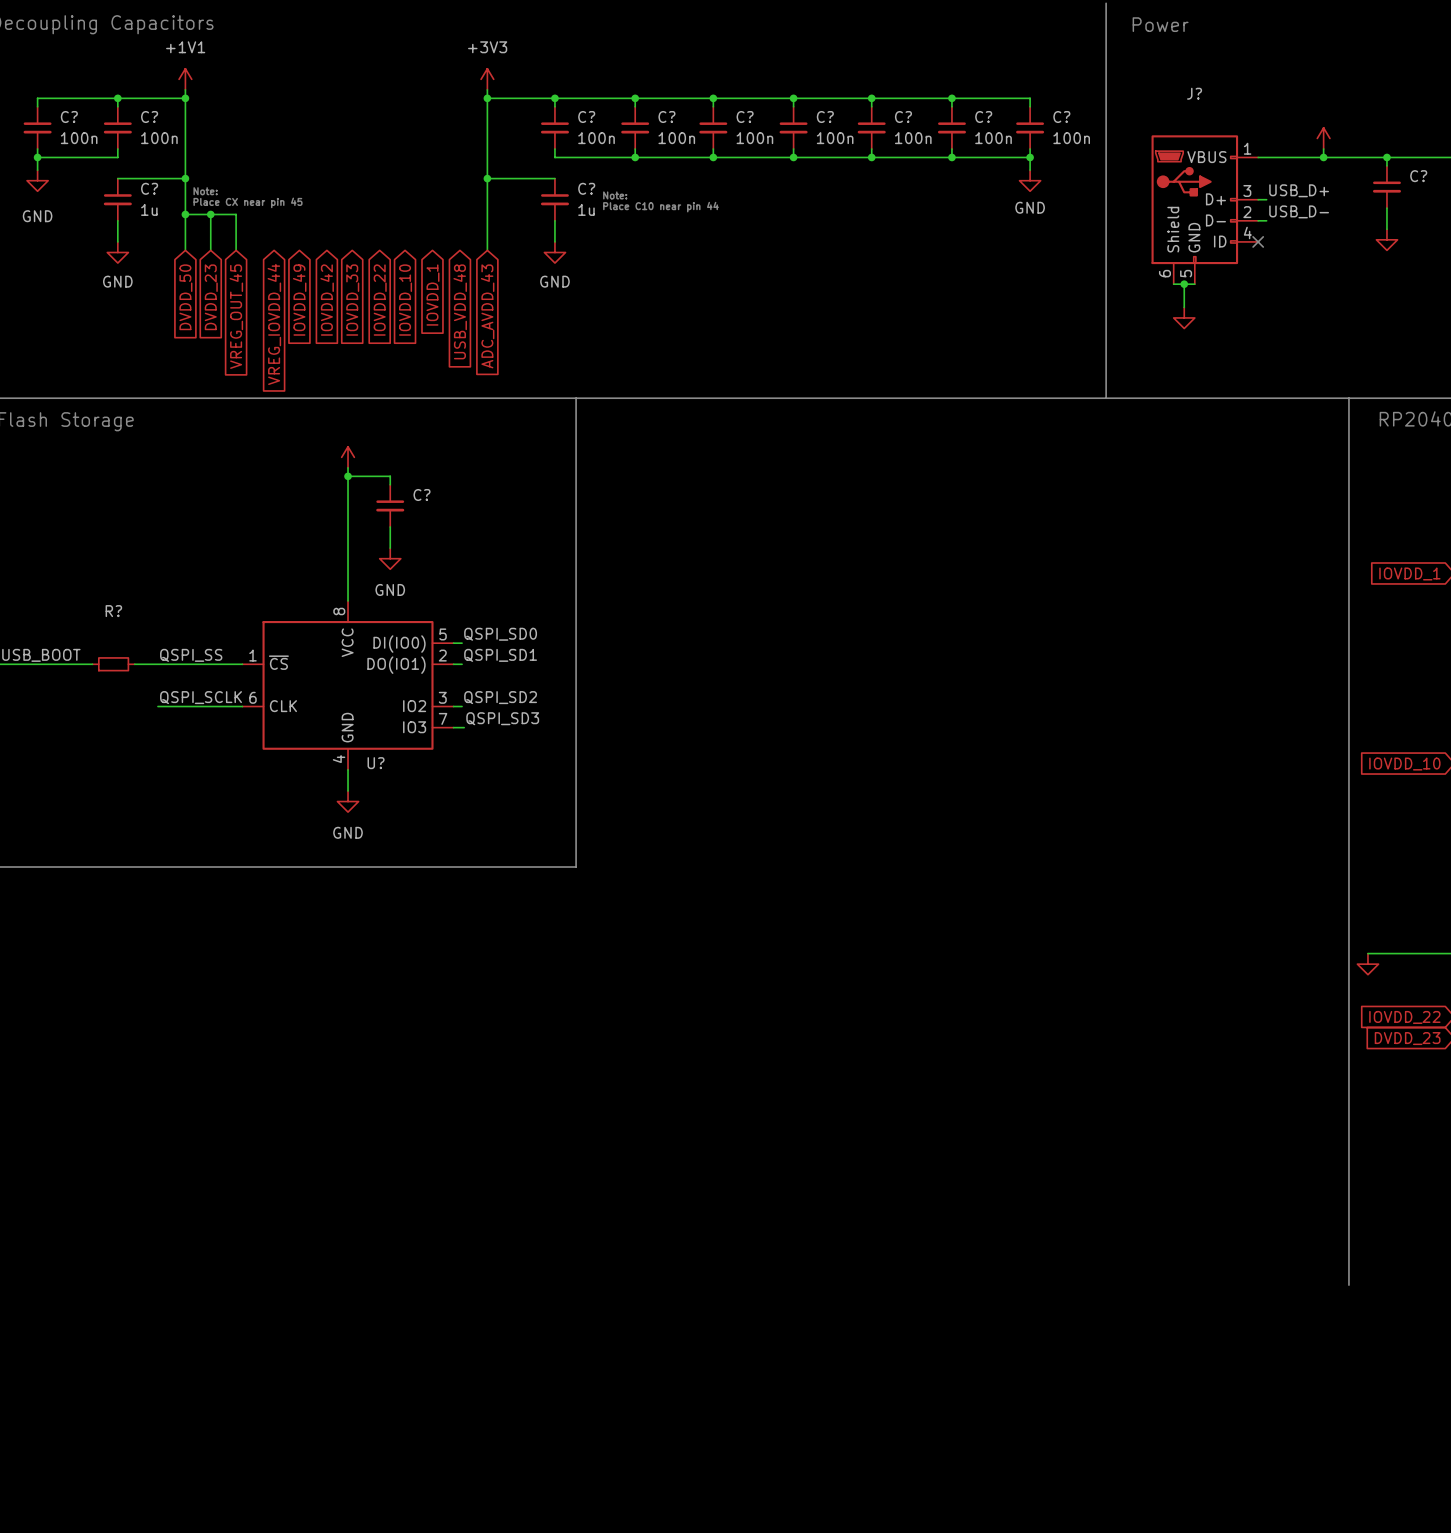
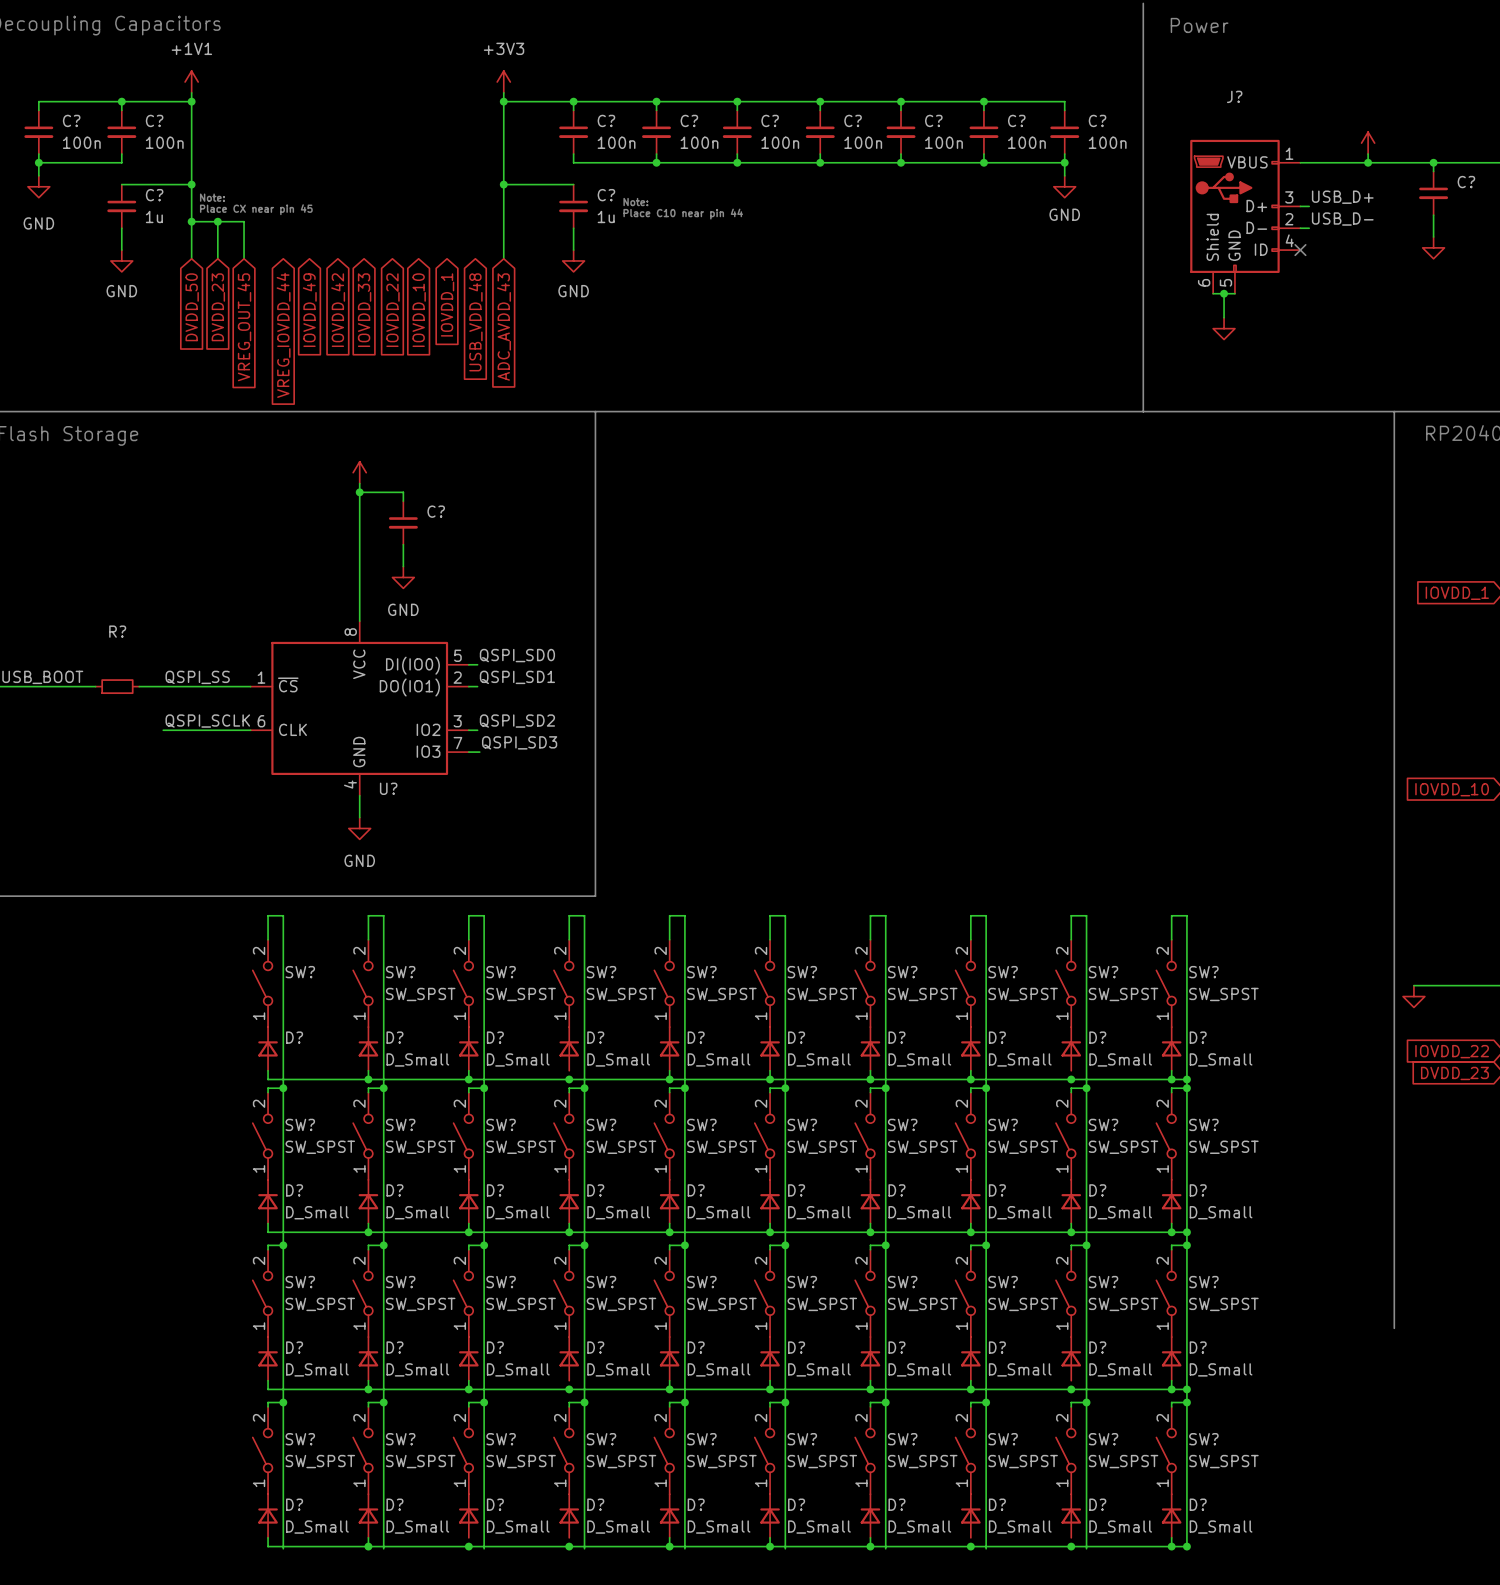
wire: none -> (268, 939) (268, 915) (283, 915) (283, 1548)
wire: none -> (368, 939) (368, 915) (383, 915) (383, 1548)
wire: none -> (468, 939) (468, 915) (484, 915) (484, 1548)
wire: none -> (569, 939) (569, 915) (584, 915) (584, 1548)
wire: none -> (669, 939) (669, 915) (684, 915) (684, 1548)
wire: none -> (770, 939) (770, 915) (785, 915) (785, 1548)
wire: none -> (870, 939) (870, 915) (885, 915) (885, 1548)
wire: none -> (970, 939) (970, 915) (986, 915) (986, 1548)
wire: none -> (1071, 939) (1071, 915) (1086, 915) (1086, 1548)
wire: none -> (1171, 939) (1171, 915) (1186, 915) (1186, 1548)
SW?: none -> (262, 983)
SW?: none -> SW_SPST (362, 983)
SW?: none -> SW_SPST (463, 983)
SW?: none -> SW_SPST (563, 983)
SW?: none -> SW_SPST (664, 983)
SW?: none -> SW_SPST (764, 983)
SW?: none -> SW_SPST (865, 983)
SW?: none -> SW_SPST (965, 983)
SW?: none -> SW_SPST (1065, 983)
SW?: none -> SW_SPST (1166, 983)
D?: none -> (268, 1048)
D?: none -> D_Small (368, 1048)
D?: none -> D_Small (468, 1048)
D?: none -> D_Small (569, 1048)
D?: none -> D_Small (669, 1048)
D?: none -> D_Small (770, 1048)
D?: none -> D_Small (870, 1048)
D?: none -> D_Small (970, 1048)
D?: none -> D_Small (1071, 1048)
D?: none -> D_Small (1171, 1048)
wire: none -> (268, 1070) (268, 1079) (1186, 1079)
wire: none -> (368, 1070) (368, 1079)
wire: none -> (468, 1070) (468, 1079)
wire: none -> (669, 1070) (669, 1079)
wire: none -> (770, 1070) (770, 1079)
wire: none -> (870, 1070) (870, 1079)
wire: none -> (970, 1070) (970, 1079)
wire: none -> (1171, 1070) (1171, 1079)
junction: none -> (368, 1079)
junction: none -> (468, 1079)
junction: none -> (569, 1079)
junction: none -> (669, 1079)
junction: none -> (770, 1079)
junction: none -> (870, 1079)
junction: none -> (970, 1079)
junction: none -> (1071, 1079)
junction: none -> (1171, 1079)
junction: none -> (1186, 1079)
wire: none -> (283, 1088) (268, 1088) (268, 1092)
junction: none -> (283, 1088)
wire: none -> (383, 1088) (368, 1088) (368, 1092)
junction: none -> (383, 1088)
wire: none -> (484, 1088) (468, 1088) (468, 1092)
junction: none -> (484, 1088)
wire: none -> (584, 1088) (569, 1088) (569, 1092)
junction: none -> (584, 1088)
wire: none -> (684, 1088) (669, 1088) (669, 1092)
junction: none -> (684, 1088)
wire: none -> (785, 1088) (770, 1088) (770, 1092)
junction: none -> (785, 1088)
wire: none -> (885, 1088) (870, 1088) (870, 1092)
junction: none -> (885, 1088)
wire: none -> (986, 1088) (970, 1088) (970, 1092)
junction: none -> (986, 1088)
wire: none -> (1086, 1088) (1071, 1088) (1071, 1092)
junction: none -> (1086, 1088)
wire: none -> (1186, 1088) (1171, 1088) (1171, 1092)
junction: none -> (1186, 1088)
SW?: none -> SW_SPST (262, 1136)
SW?: none -> SW_SPST (362, 1136)
SW?: none -> SW_SPST (463, 1136)
SW?: none -> SW_SPST (563, 1136)
SW?: none -> SW_SPST (664, 1136)
SW?: none -> SW_SPST (764, 1136)
SW?: none -> SW_SPST (865, 1136)
SW?: none -> SW_SPST (965, 1136)
SW?: none -> SW_SPST (1065, 1136)
SW?: none -> SW_SPST (1166, 1136)
D?: none -> D_Small (268, 1201)
D?: none -> D_Small (368, 1201)
D?: none -> D_Small (468, 1201)
D?: none -> D_Small (569, 1201)
D?: none -> D_Small (669, 1201)
D?: none -> D_Small (770, 1201)
D?: none -> D_Small (870, 1201)
D?: none -> D_Small (970, 1201)
D?: none -> D_Small (1071, 1201)
D?: none -> D_Small (1171, 1201)
wire: none -> (268, 1223) (268, 1232) (1186, 1232)
wire: none -> (368, 1223) (368, 1232)
wire: none -> (468, 1223) (468, 1232)
wire: none -> (569, 1223) (569, 1232)
wire: none -> (669, 1223) (669, 1232)
wire: none -> (770, 1223) (770, 1232)
wire: none -> (870, 1223) (870, 1232)
wire: none -> (970, 1223) (970, 1232)
wire: none -> (1071, 1223) (1071, 1232)
wire: none -> (1171, 1223) (1171, 1232)
junction: none -> (368, 1232)
junction: none -> (468, 1232)
junction: none -> (569, 1232)
junction: none -> (669, 1232)
junction: none -> (770, 1232)
junction: none -> (870, 1232)
junction: none -> (970, 1232)
junction: none -> (1071, 1232)
junction: none -> (1171, 1232)
junction: none -> (1186, 1232)
wire: none -> (283, 1245) (268, 1245) (268, 1249)
junction: none -> (283, 1245)
wire: none -> (383, 1245) (368, 1245) (368, 1249)
junction: none -> (383, 1245)
wire: none -> (484, 1245) (468, 1245) (468, 1249)
junction: none -> (484, 1245)
wire: none -> (584, 1245) (569, 1245) (569, 1249)
junction: none -> (584, 1245)
wire: none -> (684, 1245) (669, 1245) (669, 1249)
junction: none -> (684, 1245)
wire: none -> (785, 1245) (770, 1245) (770, 1249)
junction: none -> (785, 1245)
wire: none -> (885, 1245) (870, 1245) (870, 1249)
junction: none -> (885, 1245)
wire: none -> (986, 1245) (970, 1245) (970, 1249)
junction: none -> (986, 1245)
wire: none -> (1086, 1245) (1071, 1245) (1071, 1249)
junction: none -> (1086, 1245)
wire: none -> (1186, 1245) (1171, 1245) (1171, 1249)
junction: none -> (1186, 1245)
SW?: none -> SW_SPST (262, 1293)
SW?: none -> SW_SPST (362, 1293)
SW?: none -> SW_SPST (463, 1293)
SW?: none -> SW_SPST (563, 1293)
SW?: none -> SW_SPST (664, 1293)
SW?: none -> SW_SPST (764, 1293)
SW?: none -> SW_SPST (865, 1293)
SW?: none -> SW_SPST (965, 1293)
SW?: none -> SW_SPST (1065, 1293)
SW?: none -> SW_SPST (1166, 1293)
D?: none -> D_Small (268, 1358)
D?: none -> D_Small (368, 1358)
D?: none -> D_Small (468, 1358)
D?: none -> D_Small (569, 1358)
D?: none -> D_Small (669, 1358)
D?: none -> D_Small (770, 1358)
D?: none -> D_Small (870, 1358)
D?: none -> D_Small (970, 1358)
D?: none -> D_Small (1071, 1358)
D?: none -> D_Small (1171, 1358)
wire: none -> (268, 1380) (268, 1389) (1186, 1389)
wire: none -> (368, 1380) (368, 1389)
wire: none -> (468, 1380) (468, 1389)
wire: none -> (669, 1380) (669, 1389)
wire: none -> (770, 1380) (770, 1389)
wire: none -> (870, 1380) (870, 1389)
wire: none -> (970, 1380) (970, 1389)
wire: none -> (1171, 1380) (1171, 1389)
junction: none -> (368, 1389)
junction: none -> (468, 1389)
junction: none -> (569, 1389)
junction: none -> (669, 1389)
junction: none -> (770, 1389)
junction: none -> (870, 1389)
junction: none -> (970, 1389)
junction: none -> (1071, 1389)
junction: none -> (1171, 1389)
junction: none -> (1186, 1389)
wire: none -> (283, 1402) (268, 1402) (268, 1406)
junction: none -> (283, 1402)
wire: none -> (383, 1402) (368, 1402) (368, 1406)
junction: none -> (383, 1402)
wire: none -> (484, 1402) (468, 1402) (468, 1406)
junction: none -> (484, 1402)
wire: none -> (584, 1402) (569, 1402) (569, 1406)
junction: none -> (584, 1402)
wire: none -> (684, 1402) (669, 1402) (669, 1406)
junction: none -> (684, 1402)
wire: none -> (785, 1402) (770, 1402) (770, 1406)
junction: none -> (785, 1402)
wire: none -> (885, 1402) (870, 1402) (870, 1406)
junction: none -> (885, 1402)
wire: none -> (986, 1402) (970, 1402) (970, 1406)
junction: none -> (986, 1402)
wire: none -> (1086, 1402) (1071, 1402) (1071, 1406)
junction: none -> (1086, 1402)
wire: none -> (1186, 1402) (1171, 1402) (1171, 1406)
junction: none -> (1186, 1402)
SW?: none -> SW_SPST (262, 1450)
SW?: none -> SW_SPST (362, 1450)
SW?: none -> SW_SPST (463, 1450)
SW?: none -> SW_SPST (563, 1450)
SW?: none -> SW_SPST (664, 1450)
SW?: none -> SW_SPST (764, 1450)
SW?: none -> SW_SPST (865, 1450)
SW?: none -> SW_SPST (965, 1450)
SW?: none -> SW_SPST (1065, 1450)
SW?: none -> SW_SPST (1166, 1450)
D?: none -> D_Small (268, 1516)
D?: none -> D_Small (368, 1516)
D?: none -> D_Small (468, 1516)
D?: none -> D_Small (569, 1516)
D?: none -> D_Small (669, 1516)
D?: none -> D_Small (770, 1516)
D?: none -> D_Small (870, 1516)
D?: none -> D_Small (970, 1516)
D?: none -> D_Small (1071, 1516)
D?: none -> D_Small (1171, 1516)
wire: none -> (268, 1537) (268, 1546) (1186, 1546)
wire: none -> (368, 1537) (368, 1546)
wire: none -> (669, 1537) (669, 1546)
wire: none -> (770, 1537) (770, 1546)
wire: none -> (870, 1537) (870, 1546)
wire: none -> (1171, 1537) (1171, 1546)
junction: none -> (368, 1546)
junction: none -> (468, 1546)
junction: none -> (569, 1546)
junction: none -> (669, 1546)
junction: none -> (770, 1546)
junction: none -> (870, 1546)
junction: none -> (970, 1546)
junction: none -> (1071, 1546)
junction: none -> (1171, 1546)
junction: none -> (1186, 1546)

